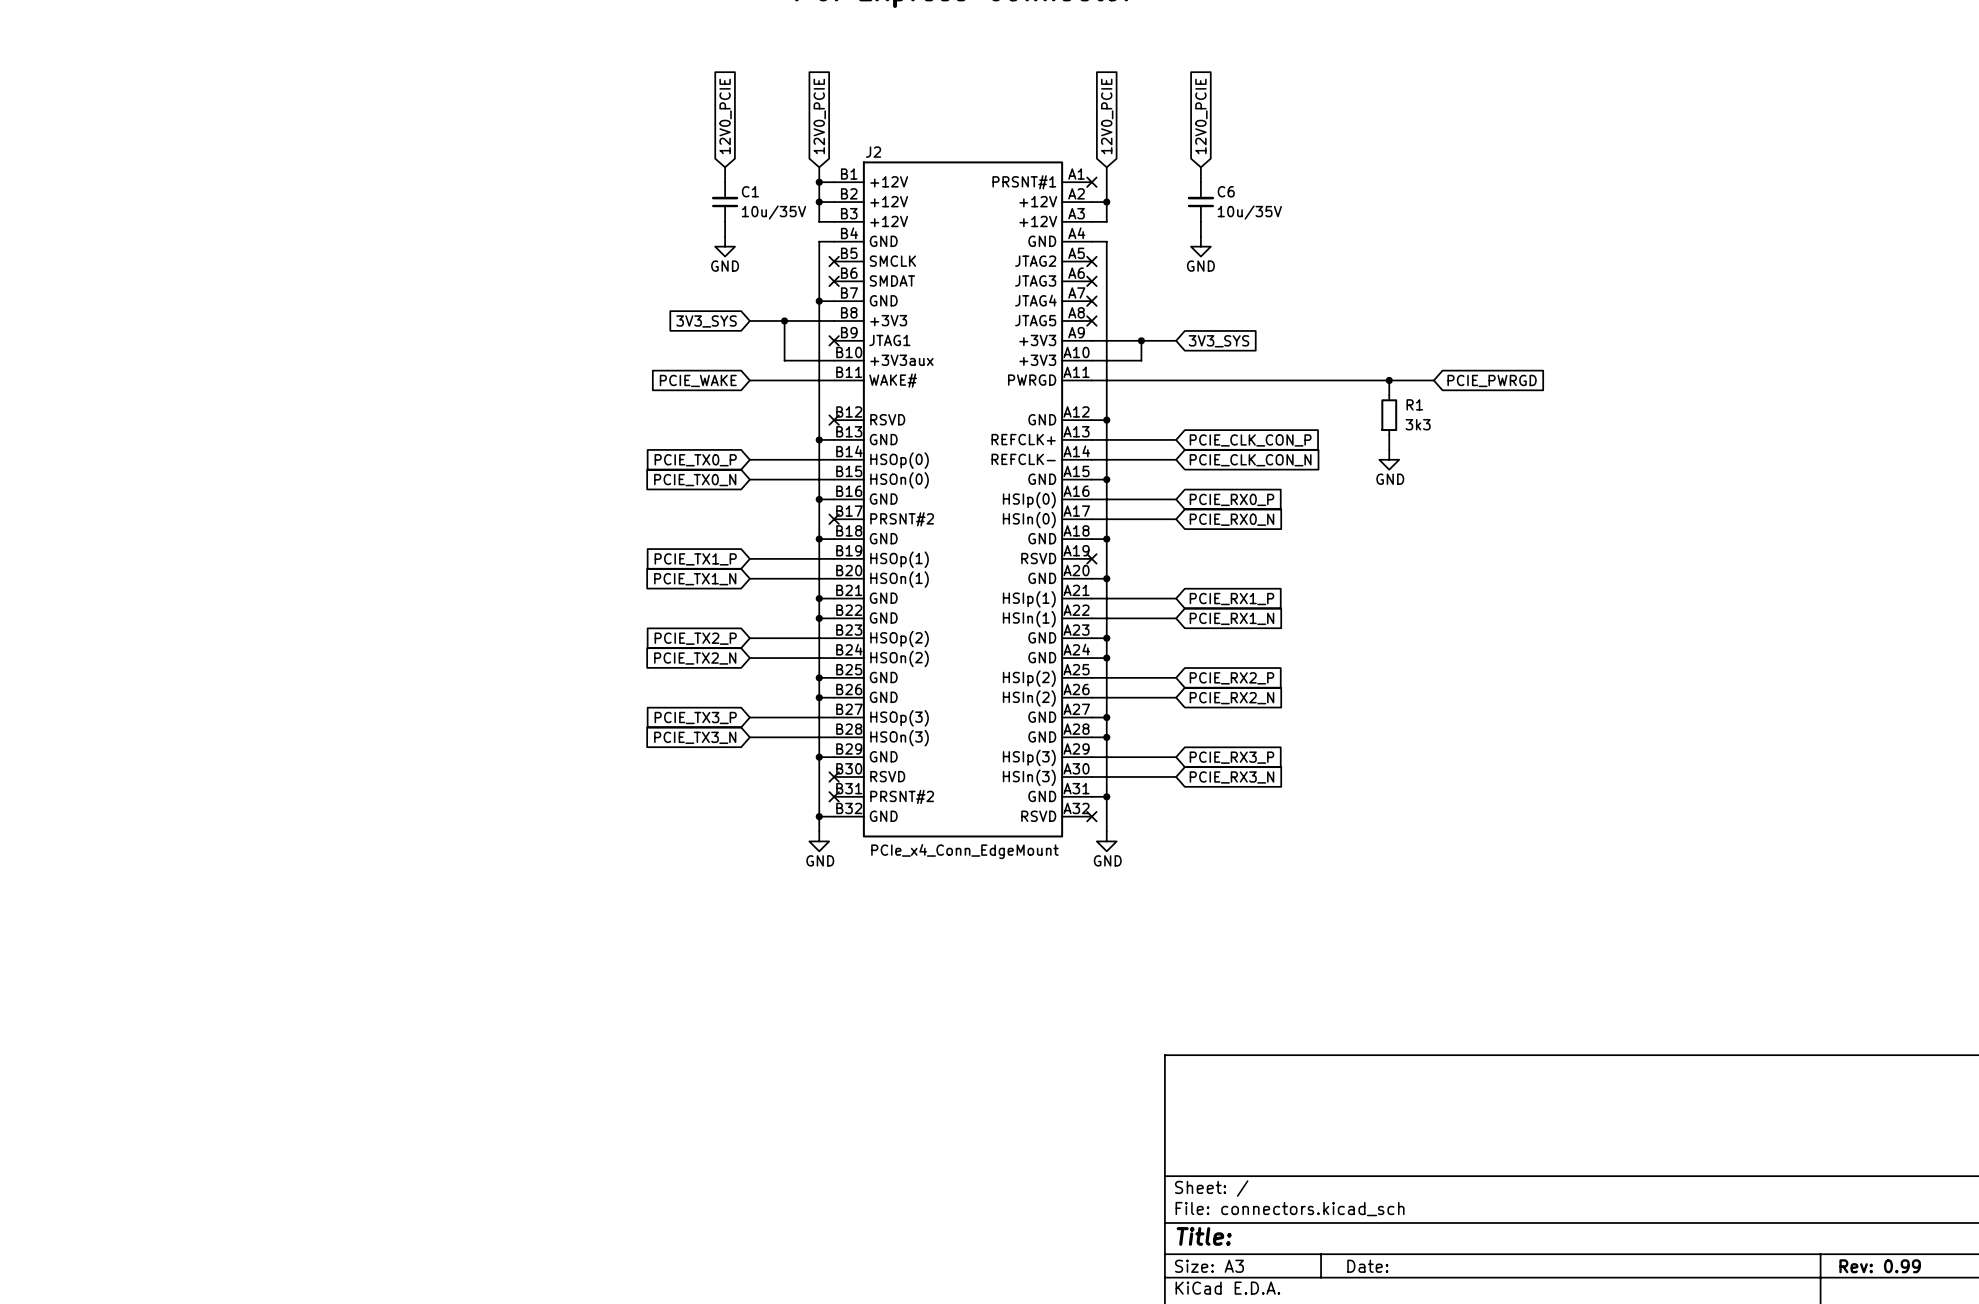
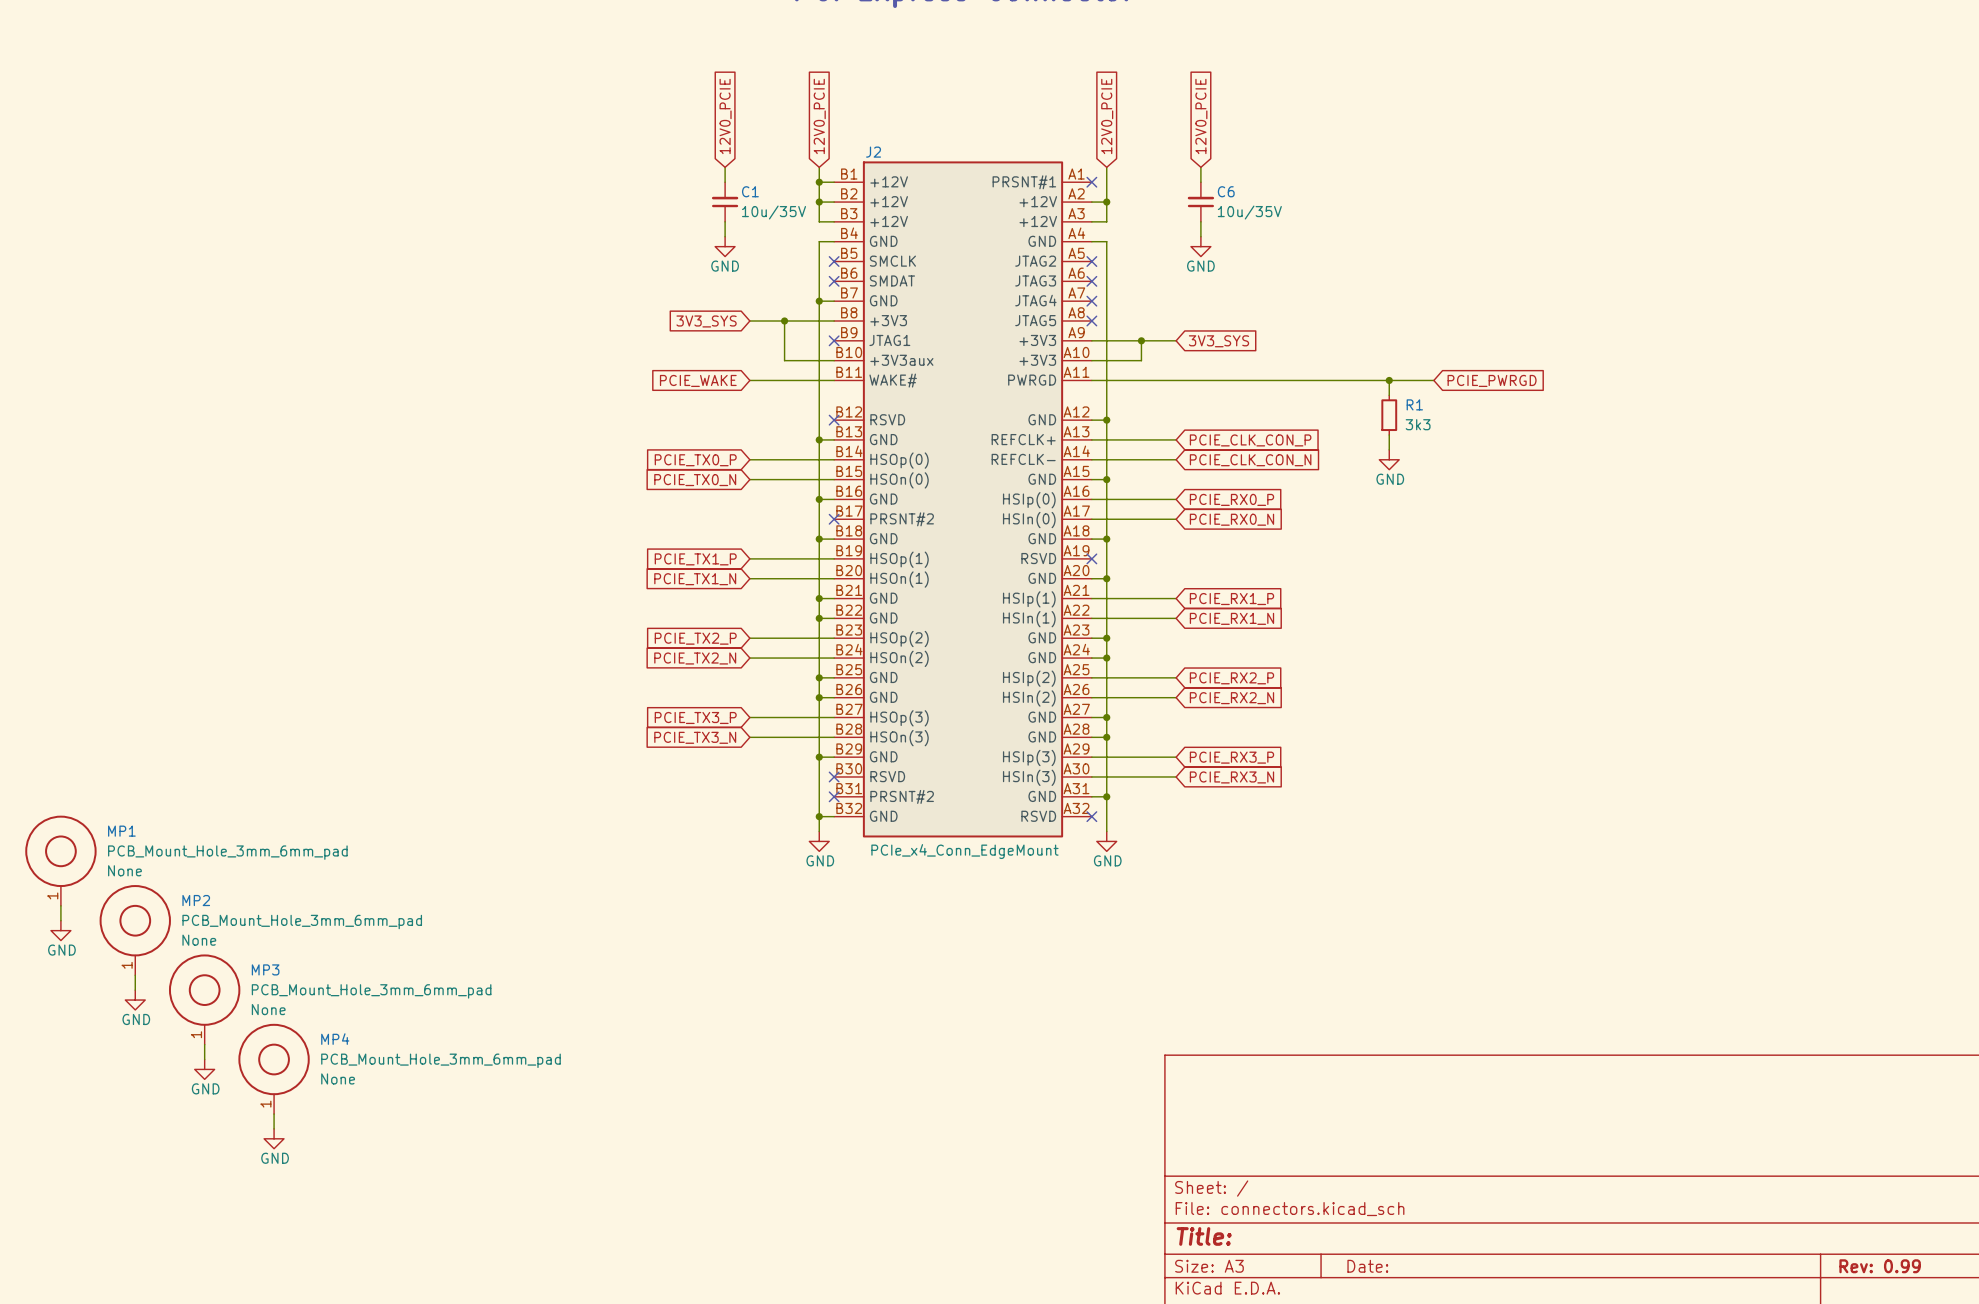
MP1: none -> PCB_Mount_Hole_3mm_6mm_pad (60, 860)
wire: none -> (60, 905) (60, 920)
power symbol: none -> GND (60, 930)
MP2: none -> PCB_Mount_Hole_3mm_6mm_pad (135, 930)
wire: none -> (135, 975) (135, 990)
MP3: none -> PCB_Mount_Hole_3mm_6mm_pad (204, 999)
power symbol: none -> GND (135, 1000)
wire: none -> (204, 1044) (204, 1059)
MP4: none -> PCB_Mount_Hole_3mm_6mm_pad (274, 1068)
power symbol: none -> GND (204, 1069)
wire: none -> (274, 1114) (274, 1128)
power symbol: none -> GND (274, 1138)

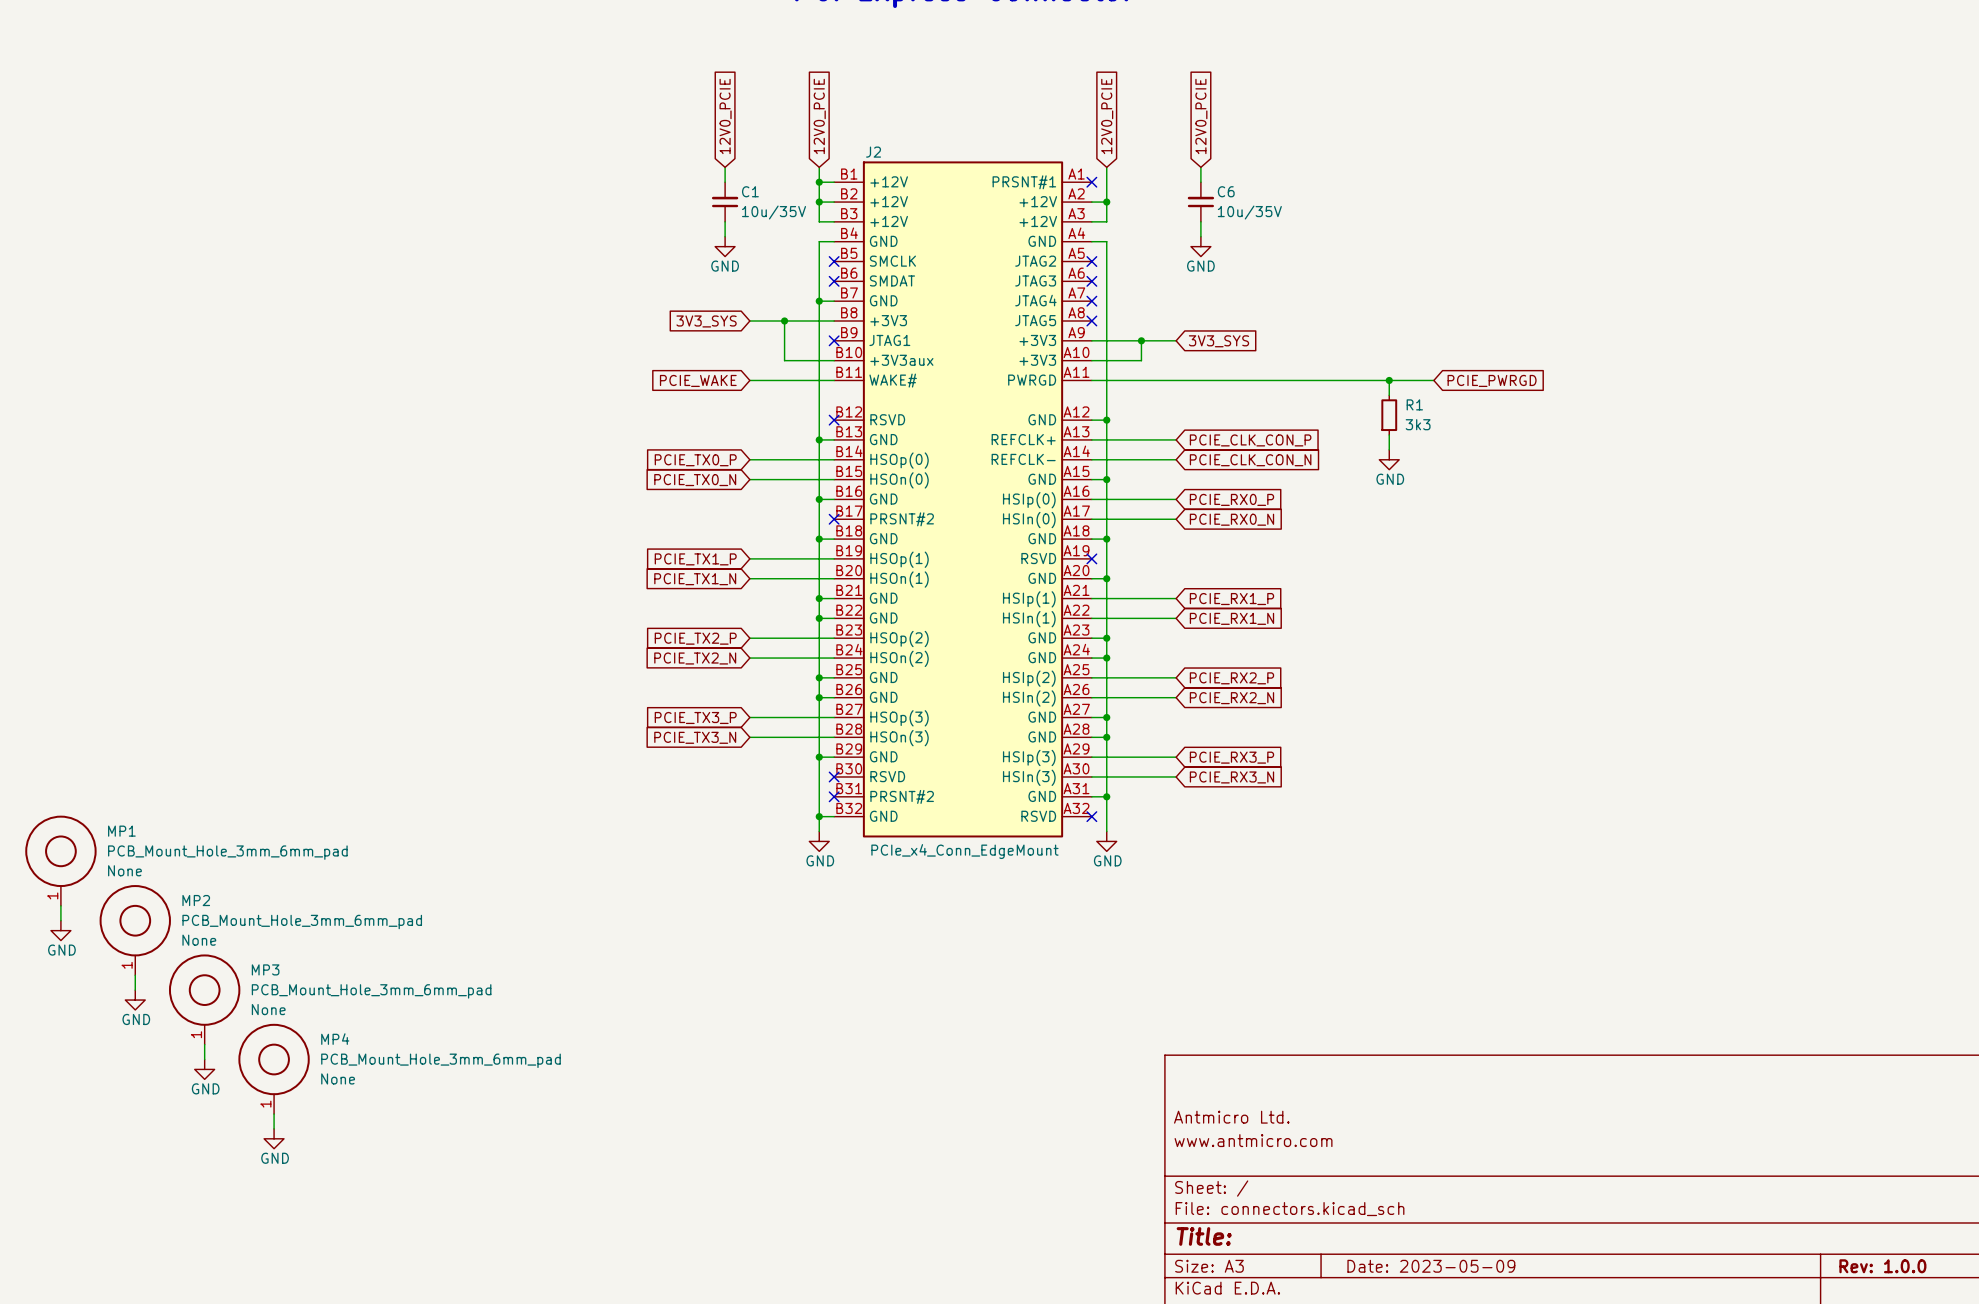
title block: none -> Antmicro Ltd. (1231, 1117)
title block: none -> www.antmicro.com (1253, 1140)
title block: Date: (1367, 1266) -> Date: 2023-05-09 (1431, 1266)
title block: Rev: 0.99 (1880, 1266) -> Rev: 1.0.0 (1882, 1266)

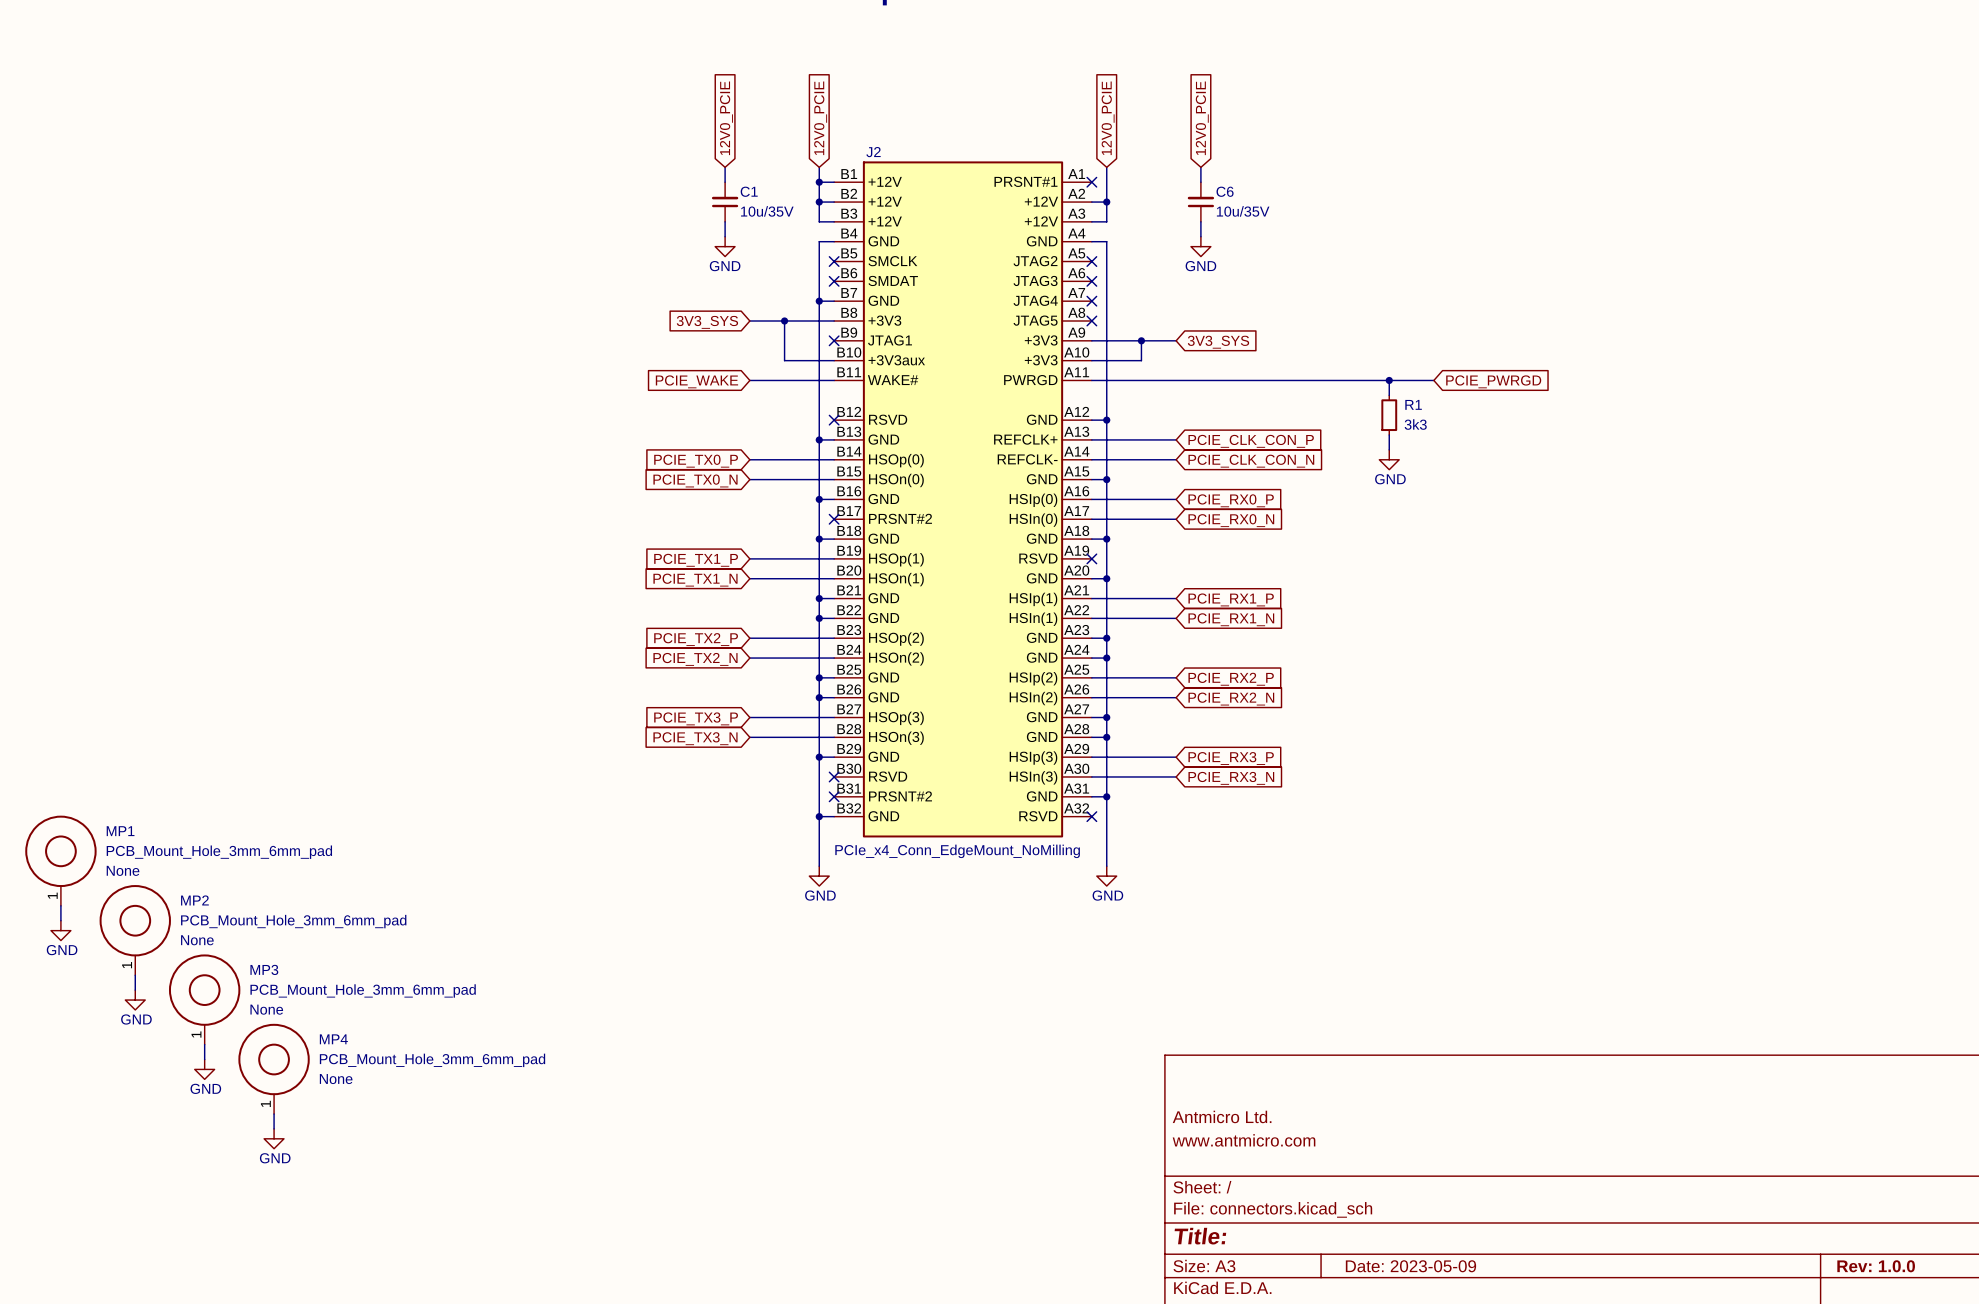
wire: none -> (819, 831) (819, 866)
wire: none -> (1106, 831) (1106, 866)
power symbol position: GND (819, 841) -> GND (819, 876)
power symbol position: GND (1106, 841) -> GND (1106, 876)
J2 value: PCIe_x4_Conn_EdgeMount (964, 851) -> PCIe_x4_Conn_EdgeMount_NoMilling (957, 851)

